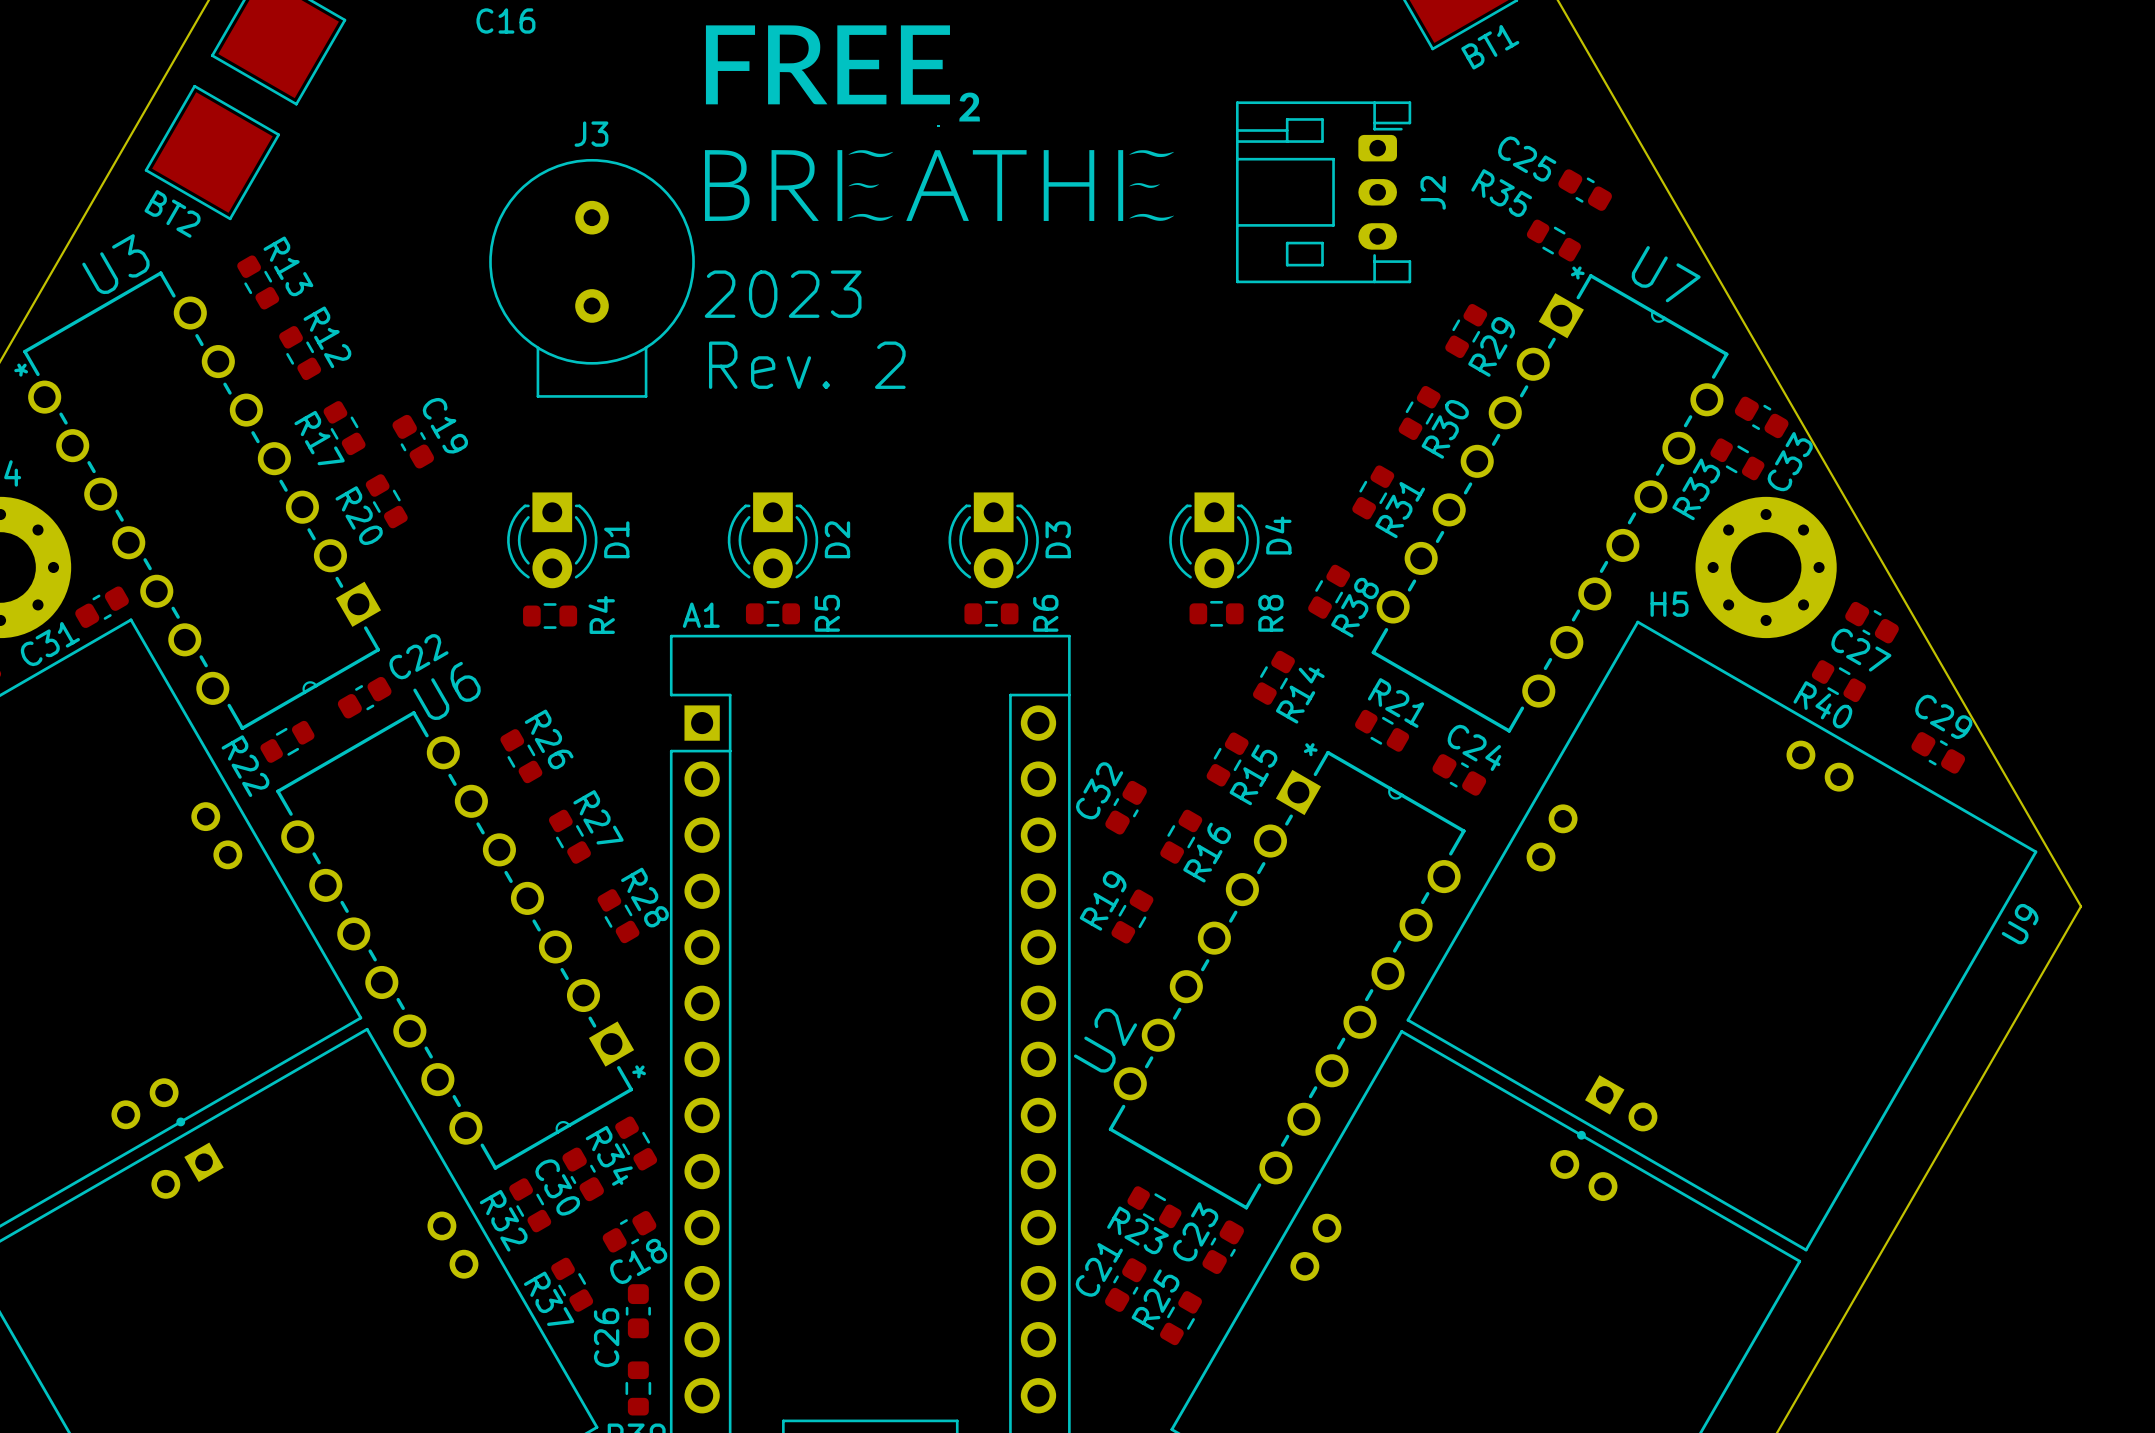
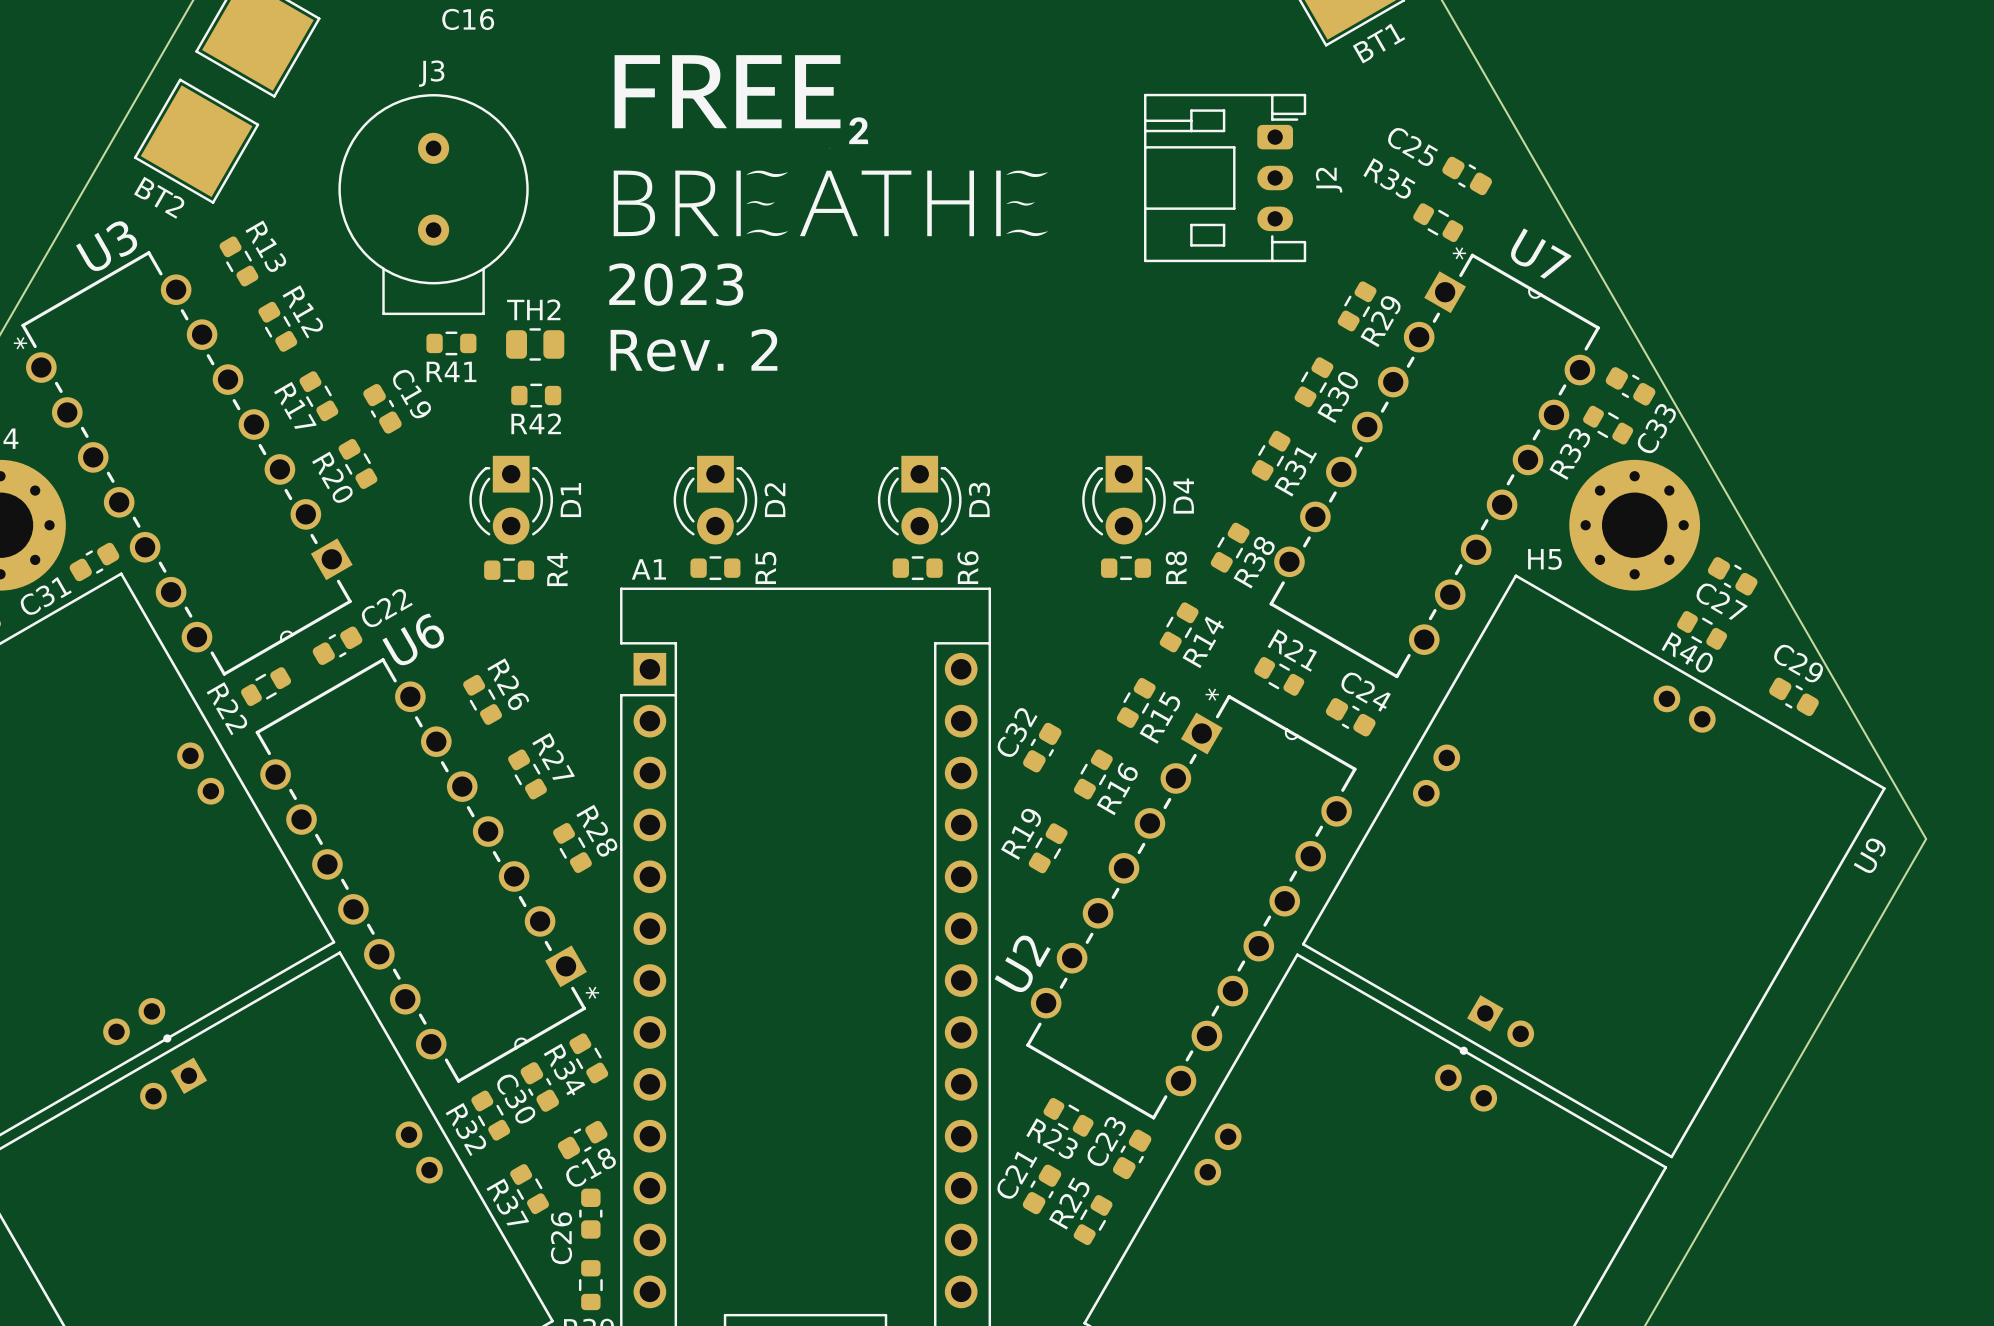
part position: (939, 123) -> (830, 145)
J3 position: (592, 278) -> (433, 204)
text position: 2023 (783, 294) -> 2023 (676, 284)
text position: Rev. 2 (807, 365) -> Rev. 2 (694, 350)
R41: none -> (451, 343)
TH2: none -> (535, 344)
R42: none -> (536, 395)

